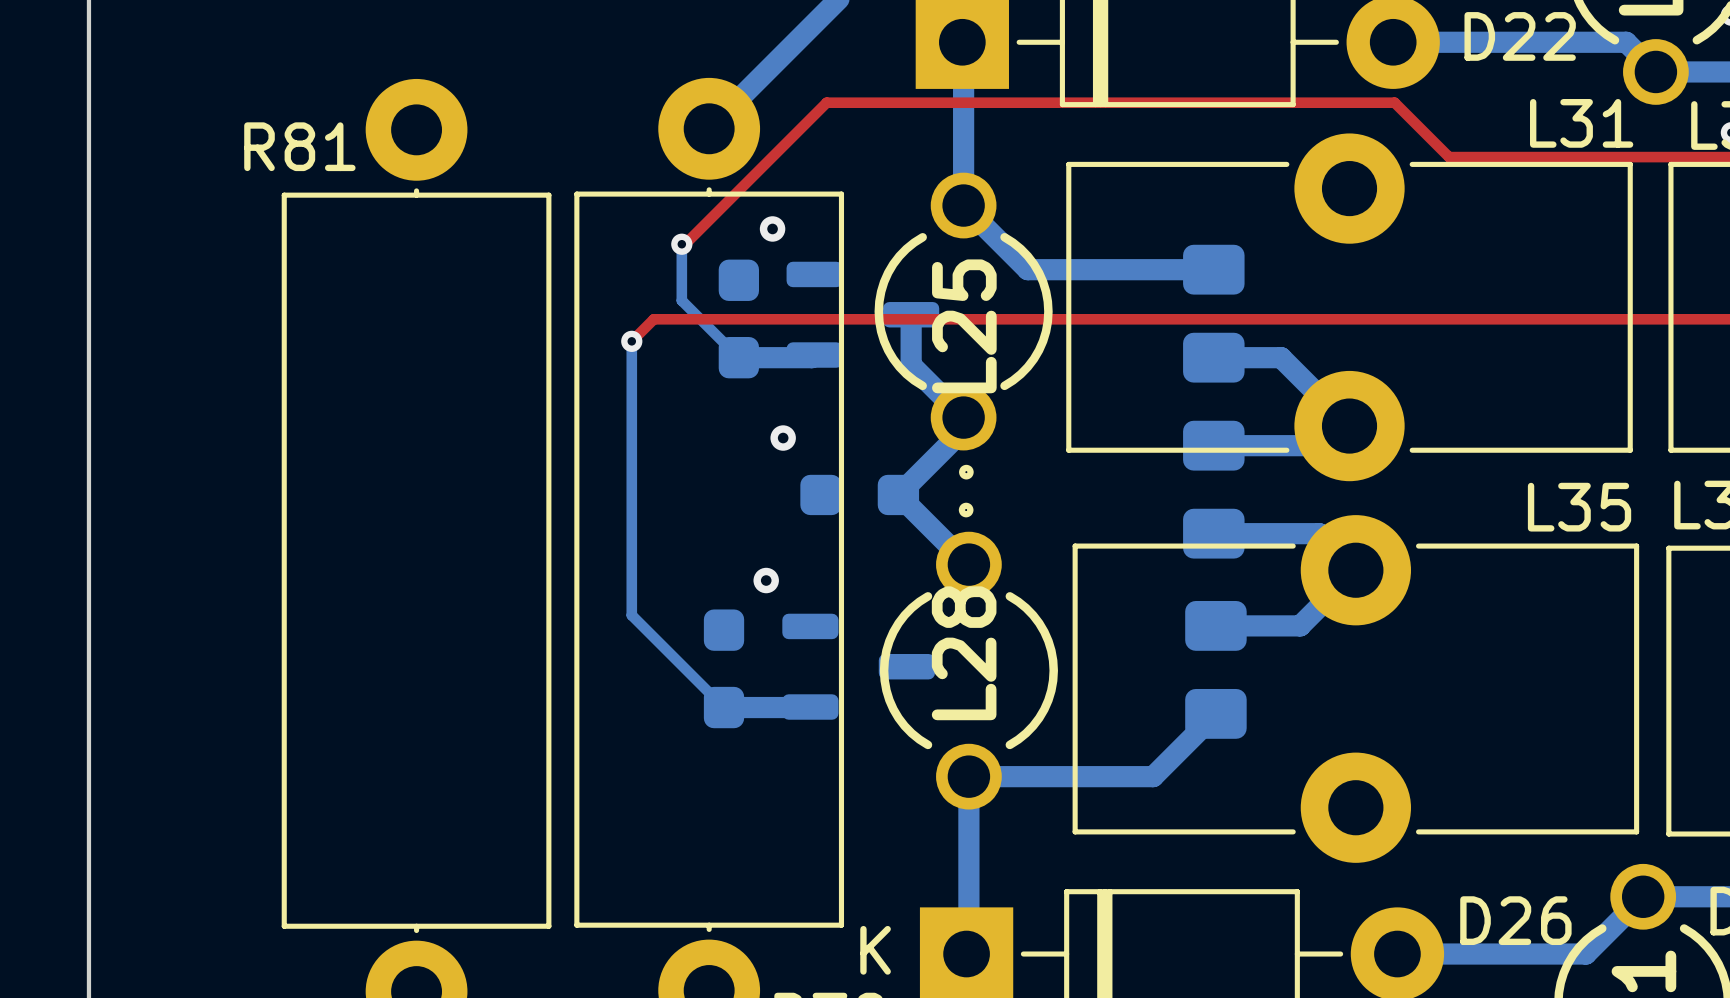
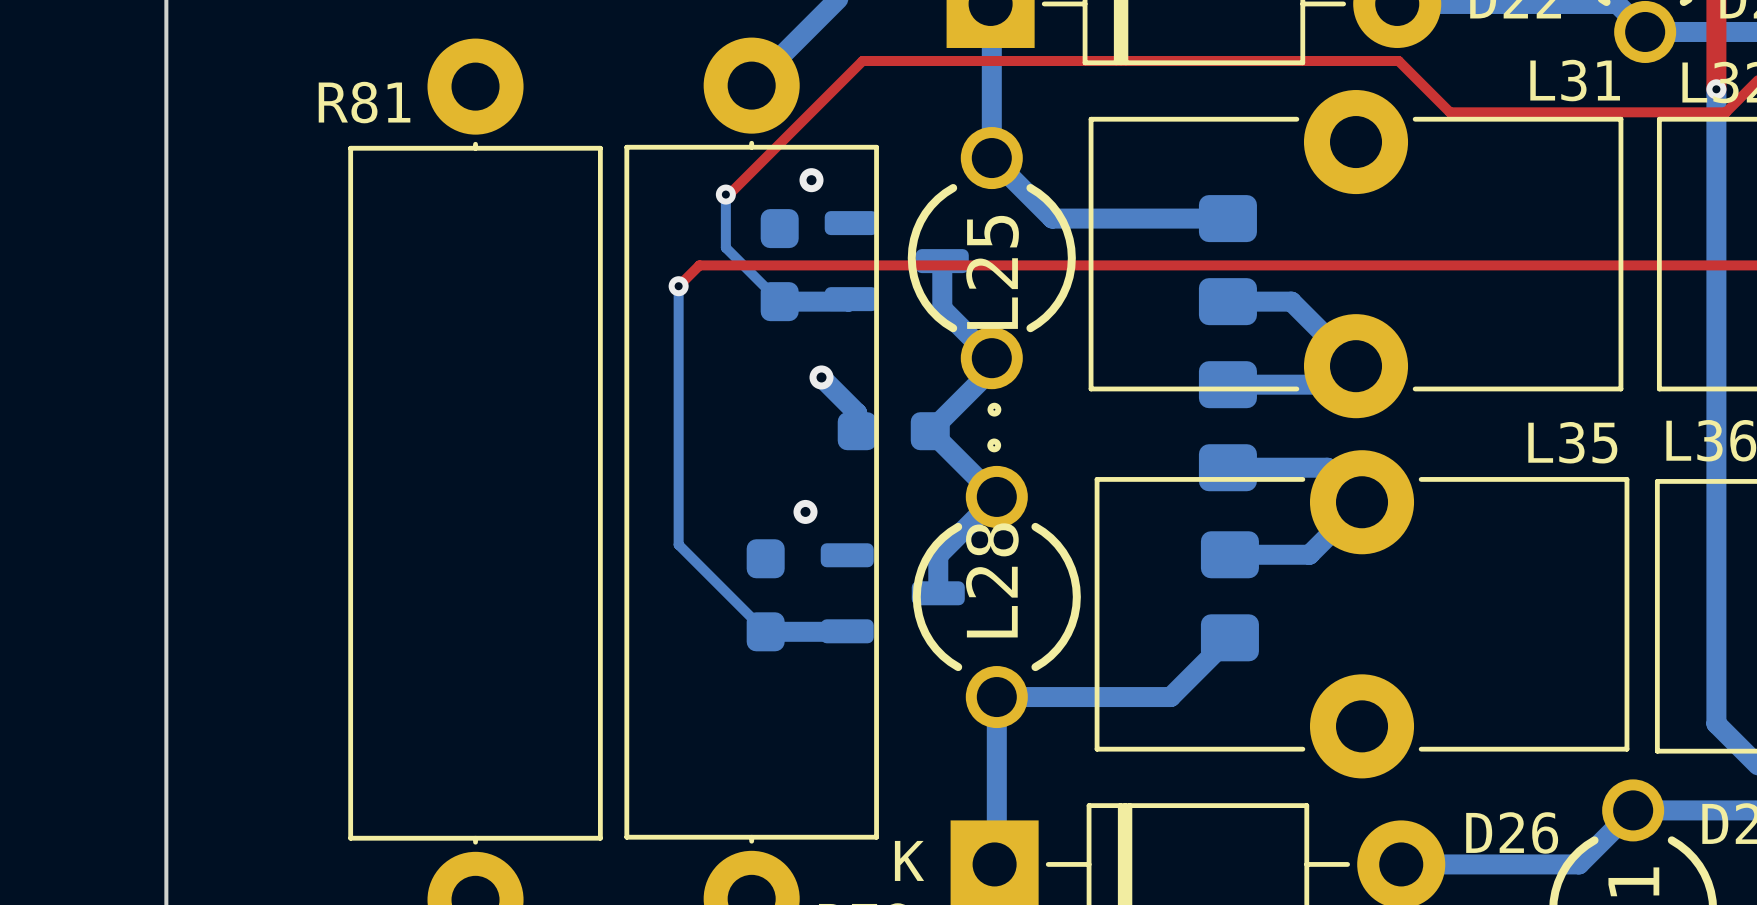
bottom track: none -> (821, 377) (857, 413) (857, 431)
bottom track: none -> (996, 496) (938, 555) (938, 593)

